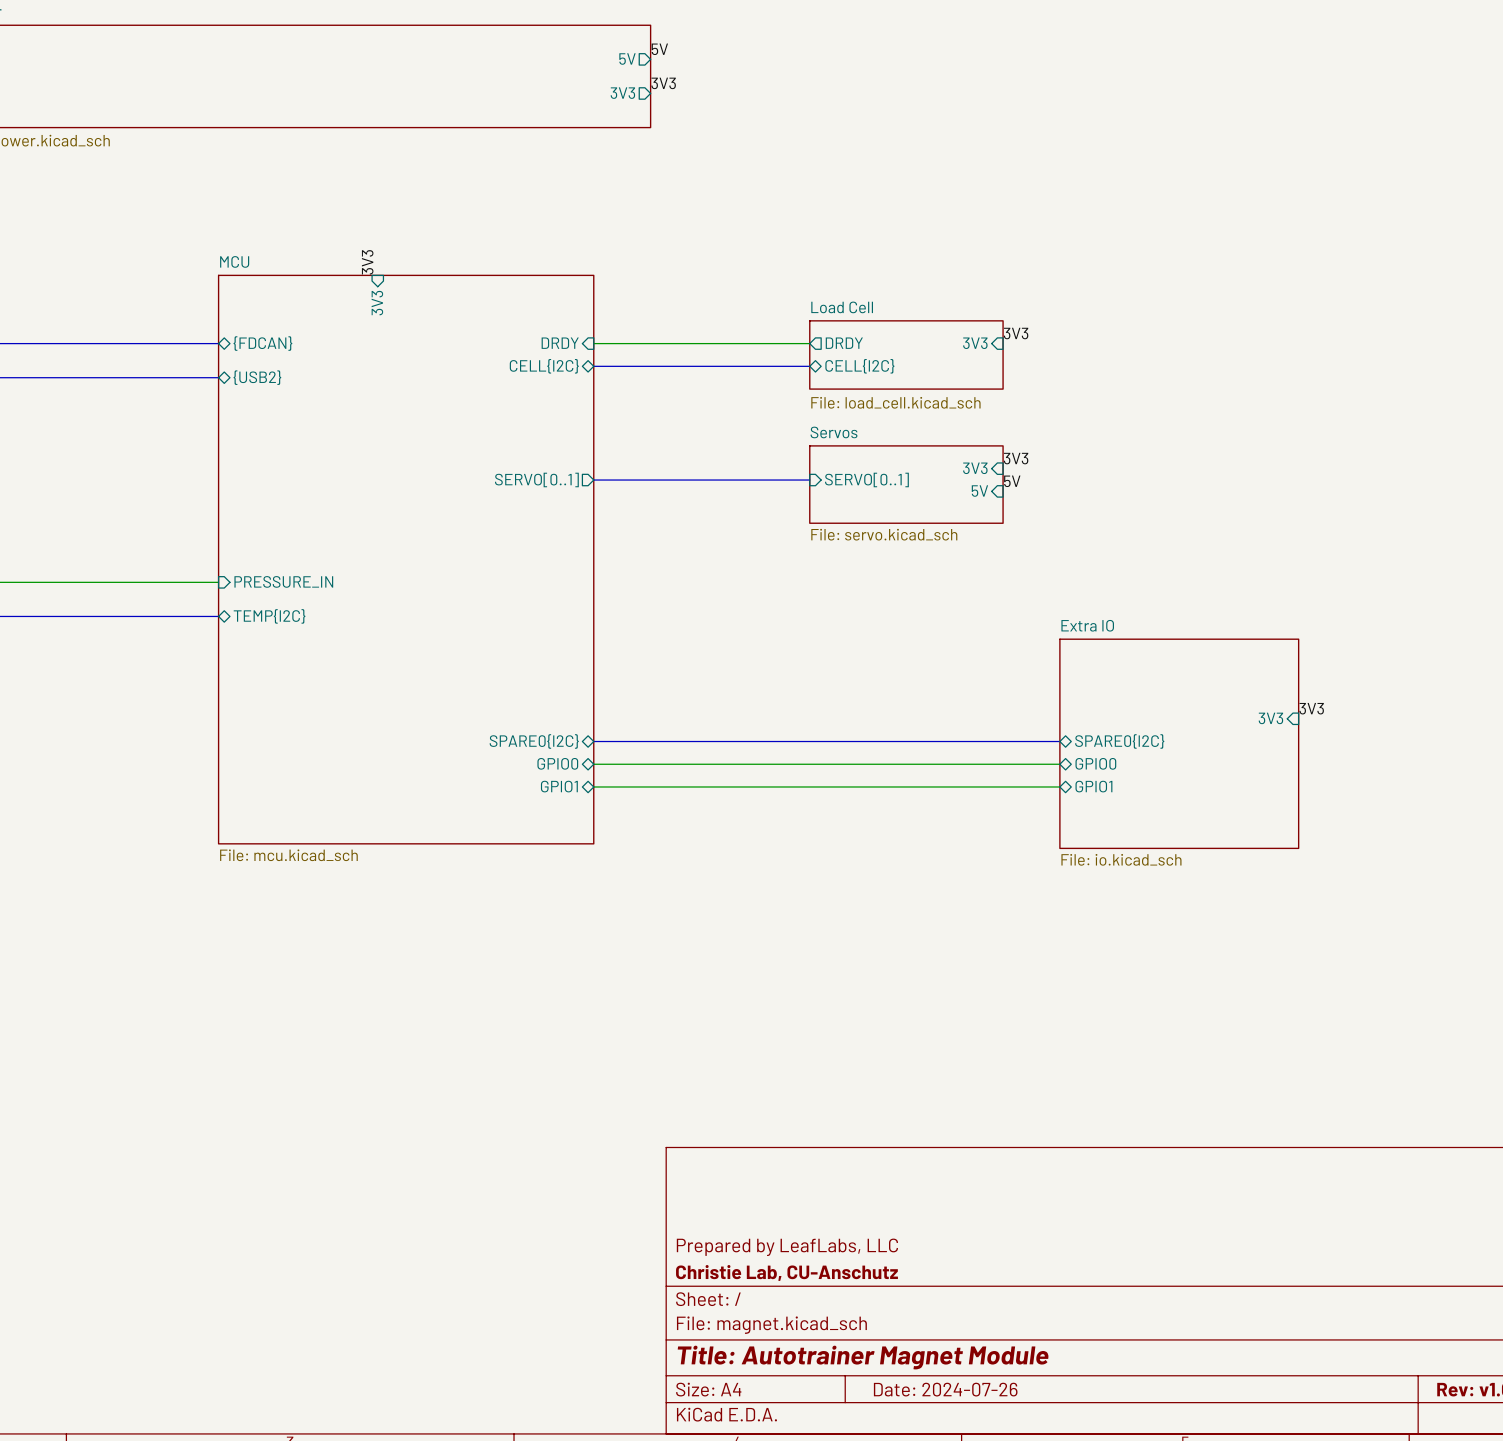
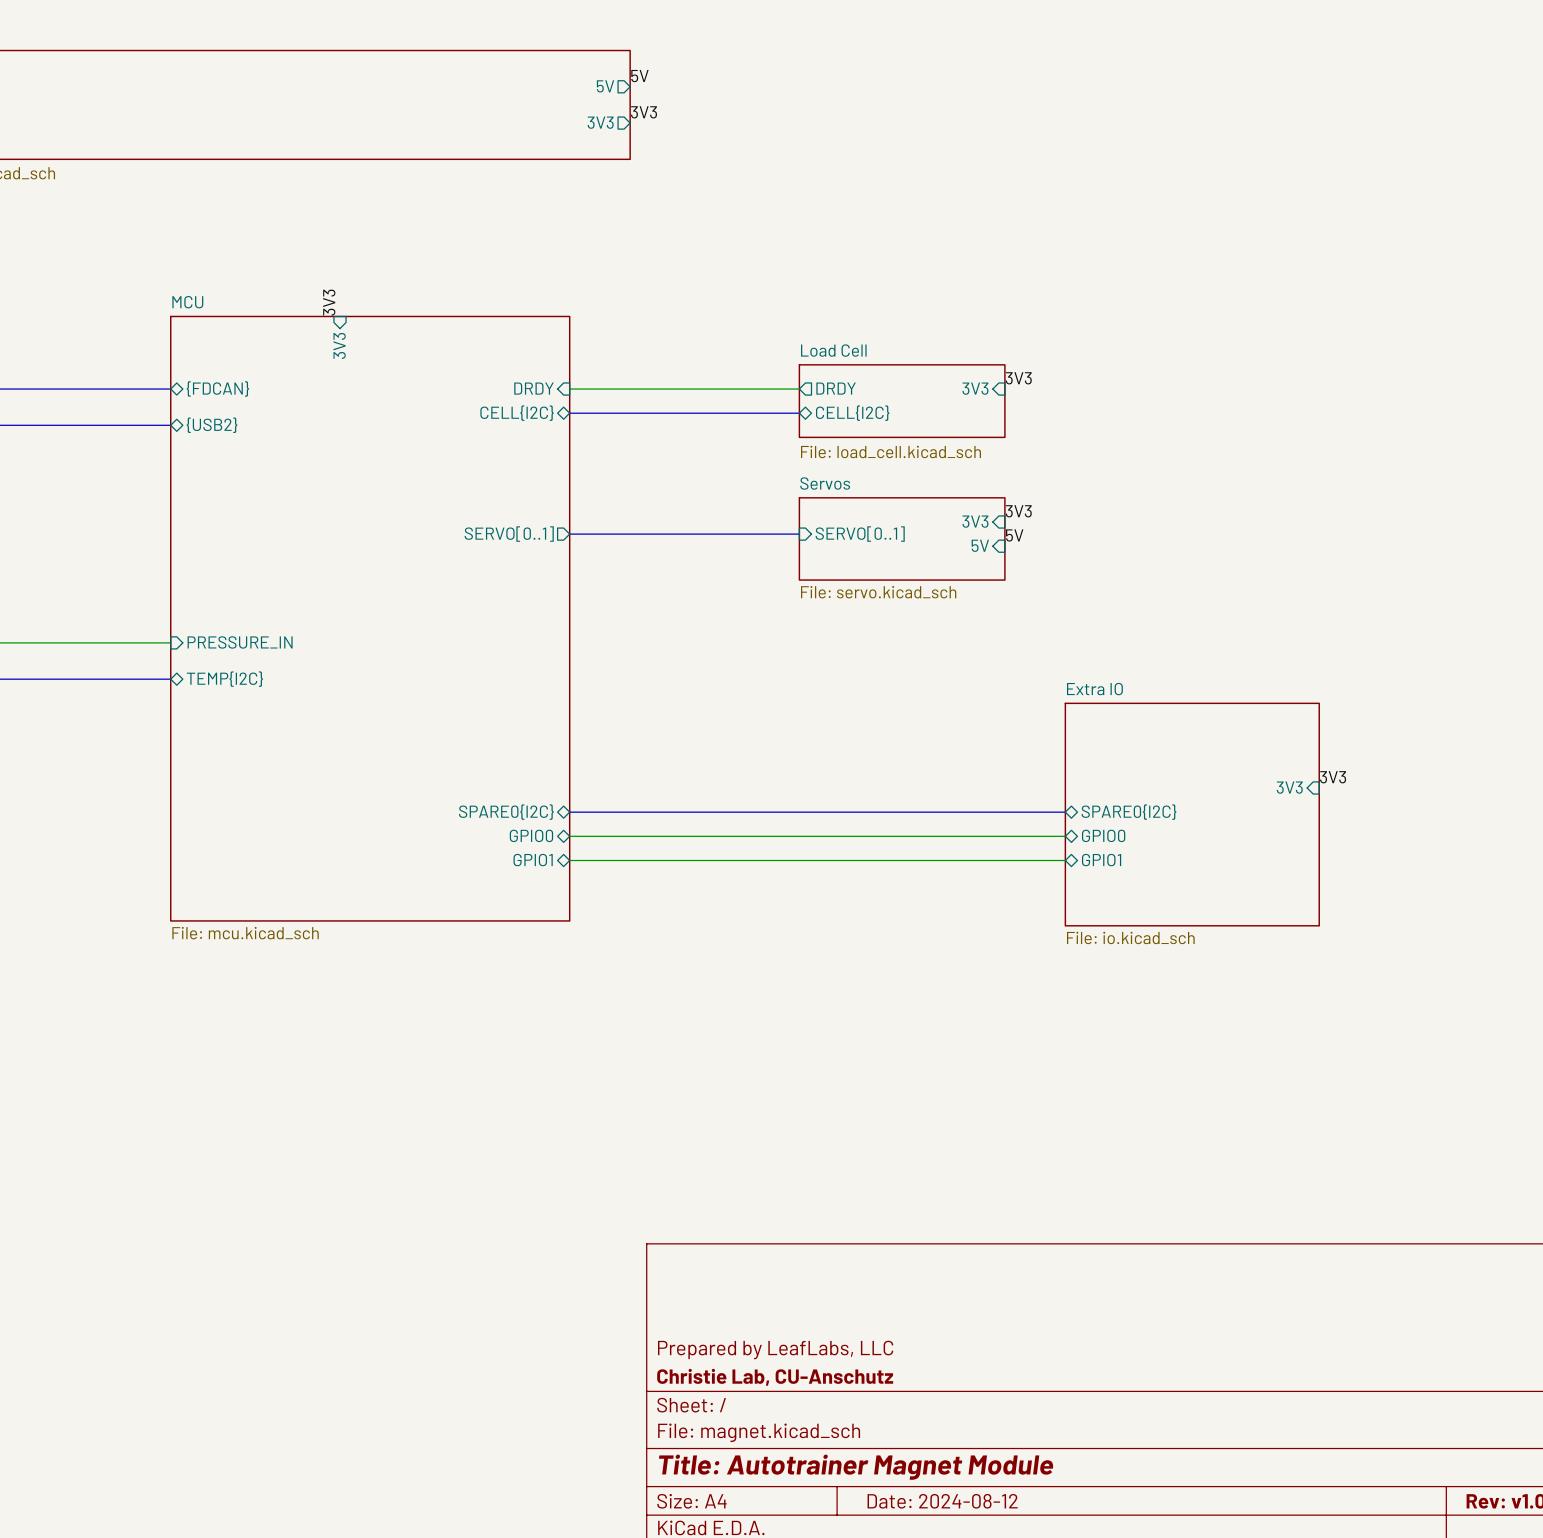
title block: Date: 2024-07-26 (945, 1389) -> Date: 2024-08-12 (942, 1501)

